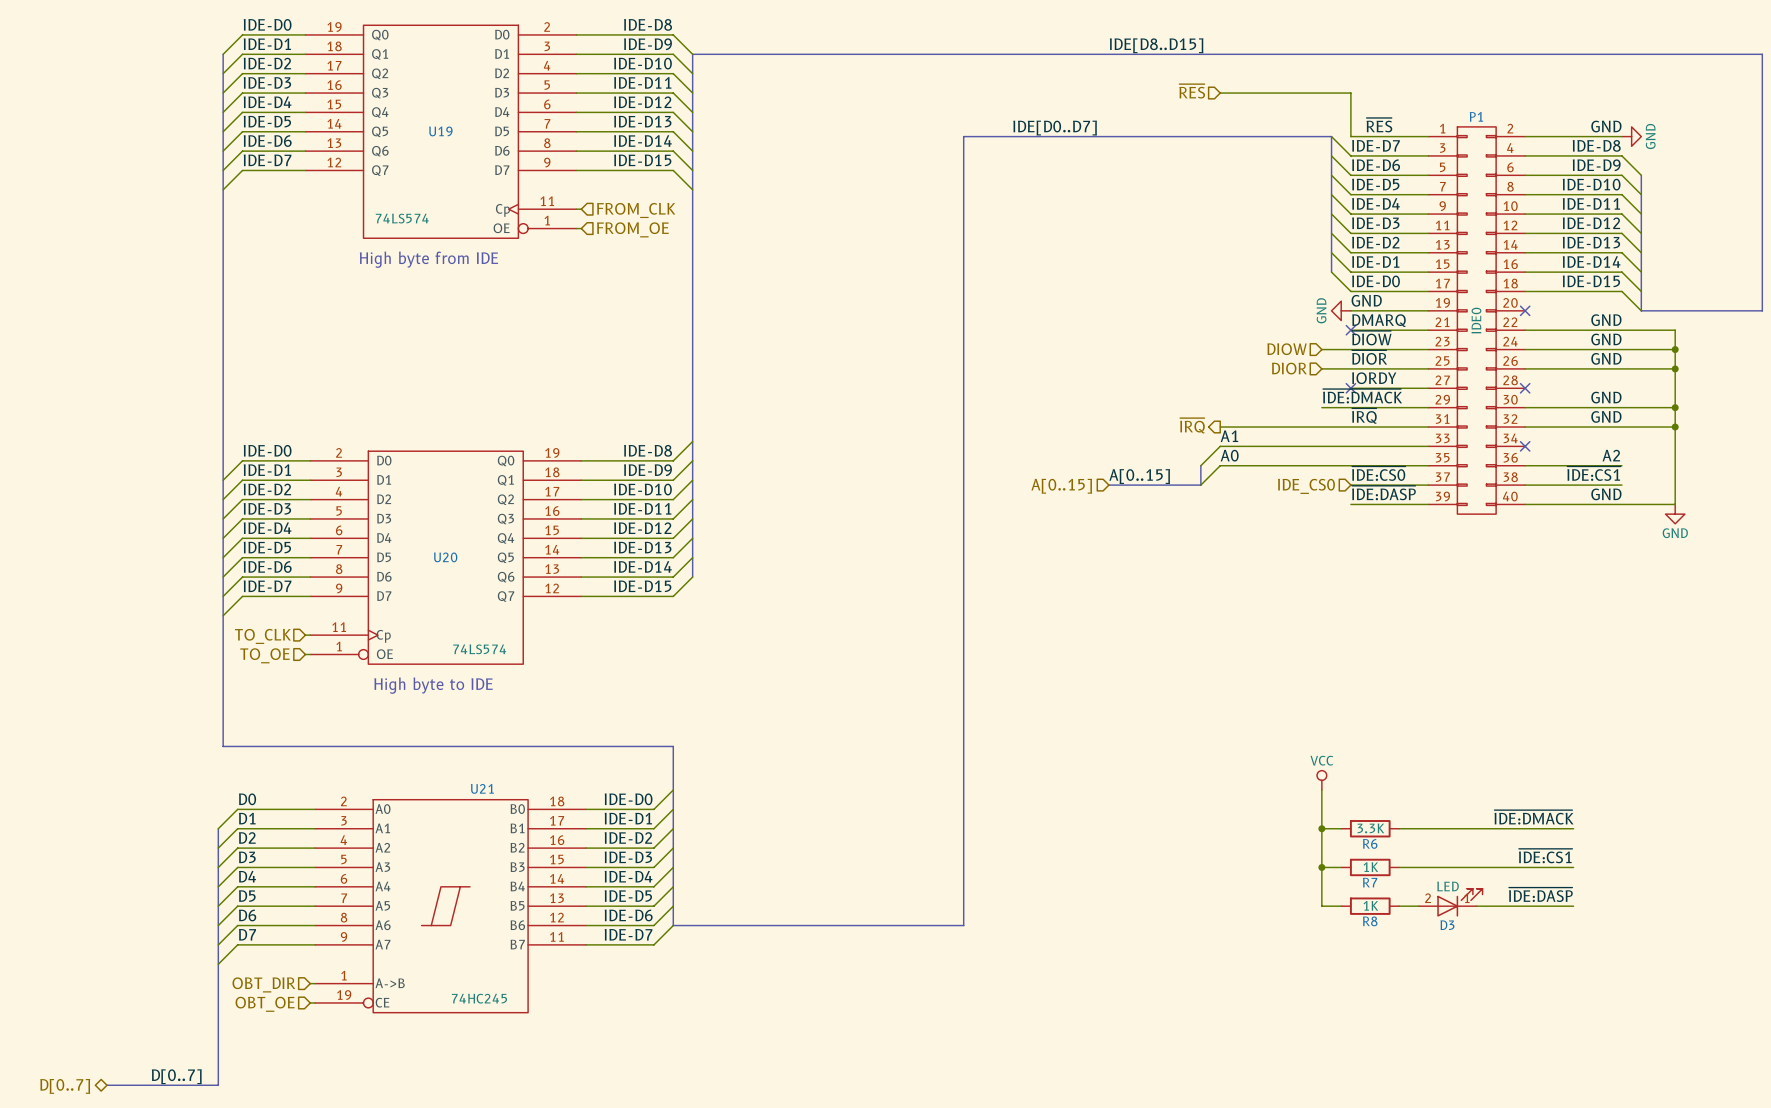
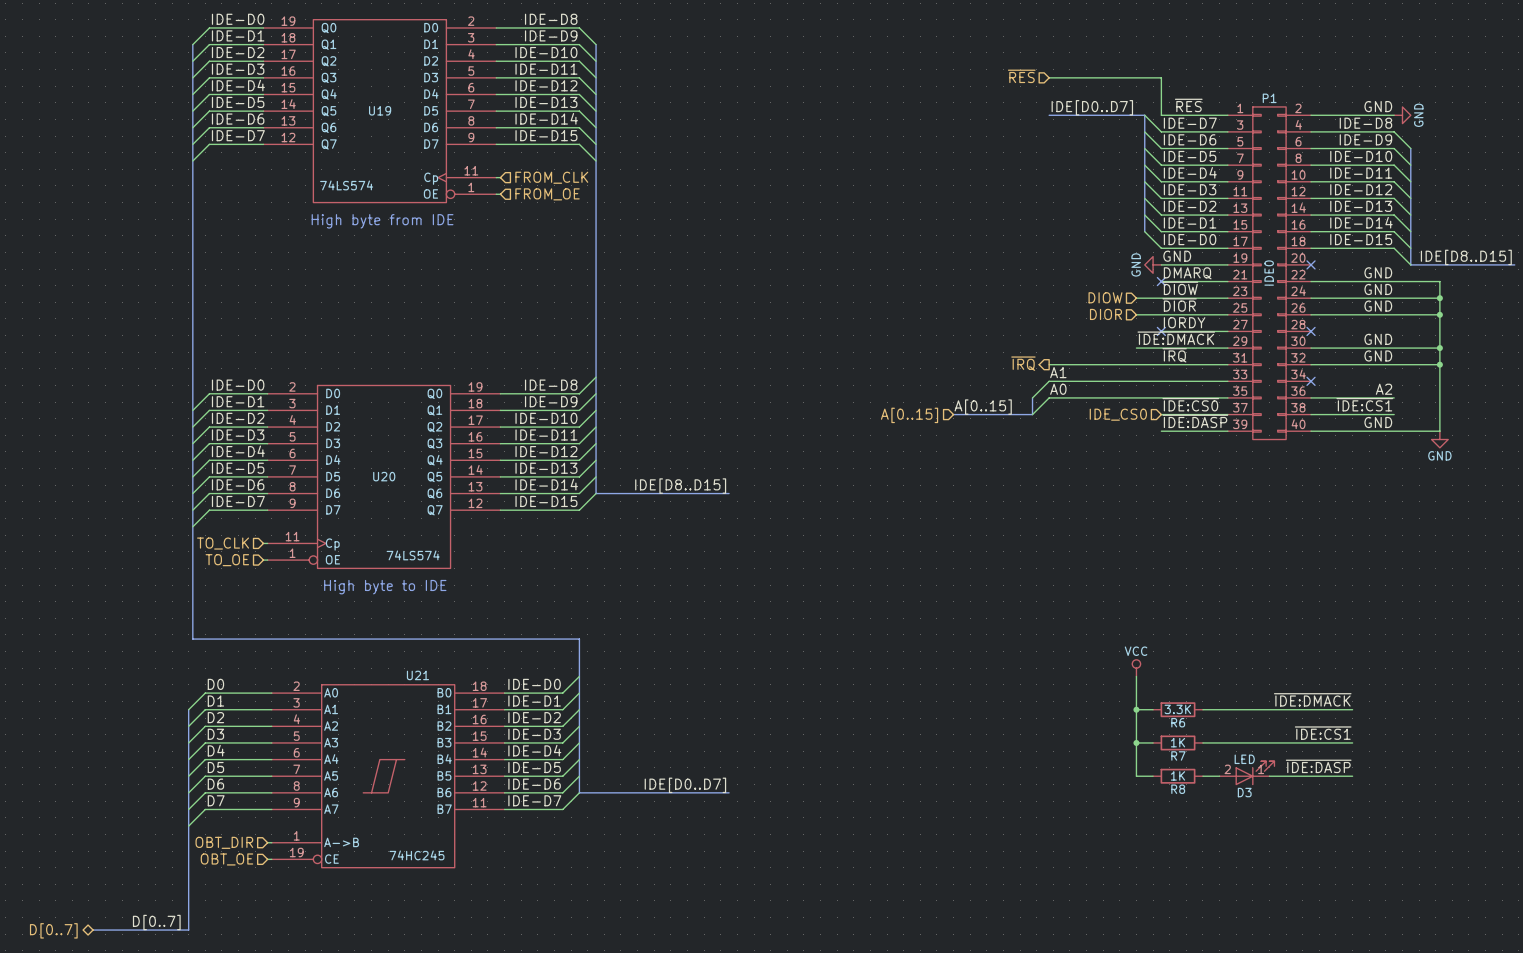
label: IDE[D8..D15] (1156, 45) -> none
bus: (692, 54) (1762, 54) (1762, 310) -> none
label: IDE[D0..D7] (1055, 128) -> none
label: none -> IDE[D0..D7] (1092, 107)
bus: (1220, 136) (963, 136) (963, 925) (847, 925) -> none
label: none -> IDE[D8..D15] (1466, 257)
label: none -> IDE[D8..D15] (680, 486)
bus: none -> (596, 493) (729, 493)
label: none -> IDE[D0..D7] (685, 785)

